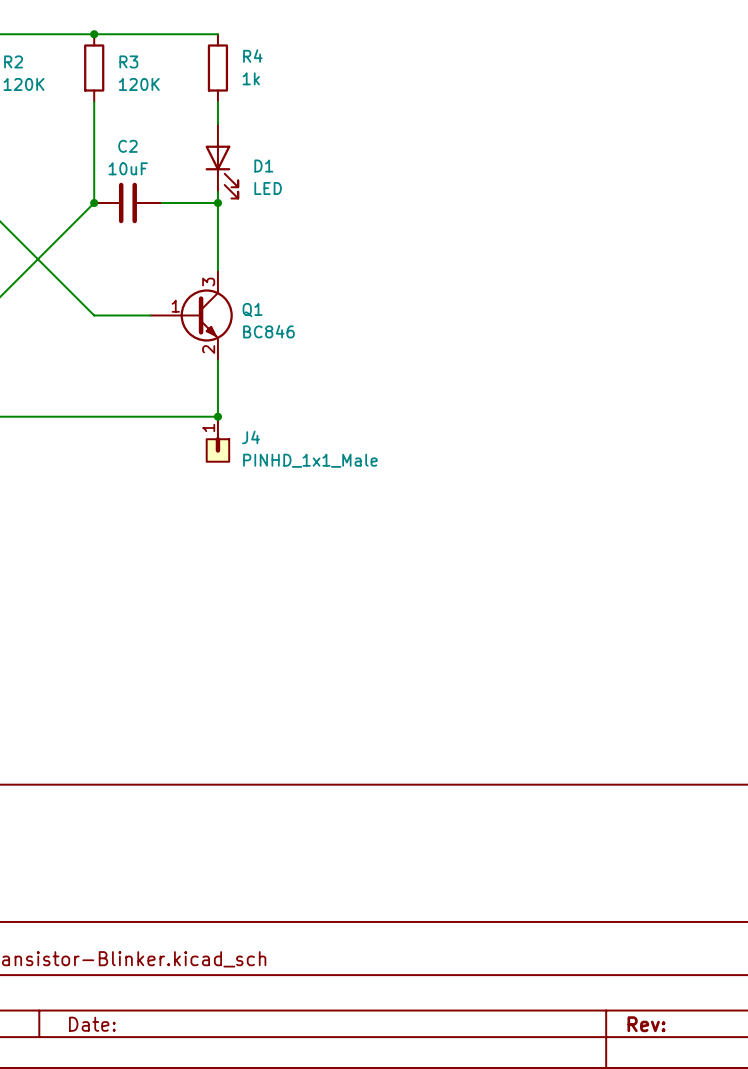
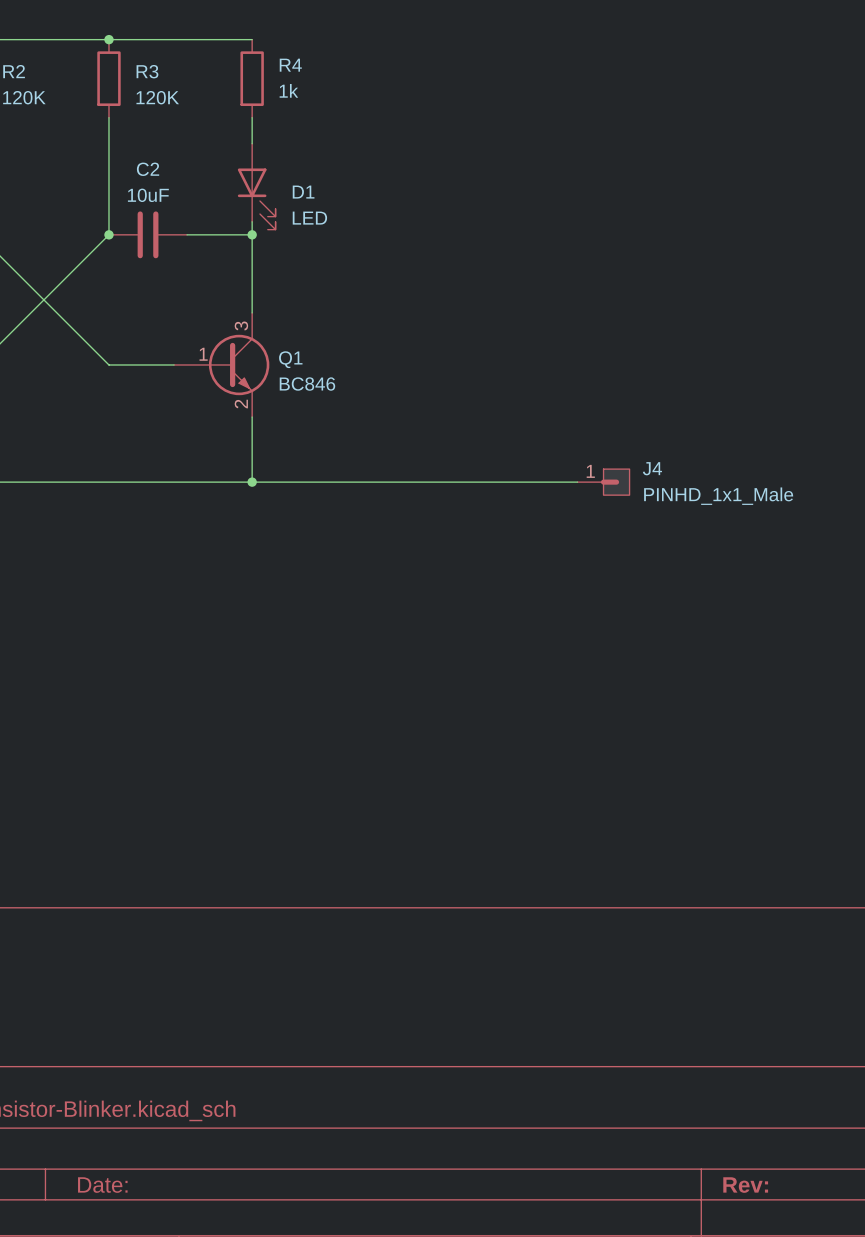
wire: none -> (252, 482) (577, 482)
J4 position: (217, 439) -> (603, 482)
J4 rotation: 0° (217, 449) -> 90° counterclockwise (615, 482)

